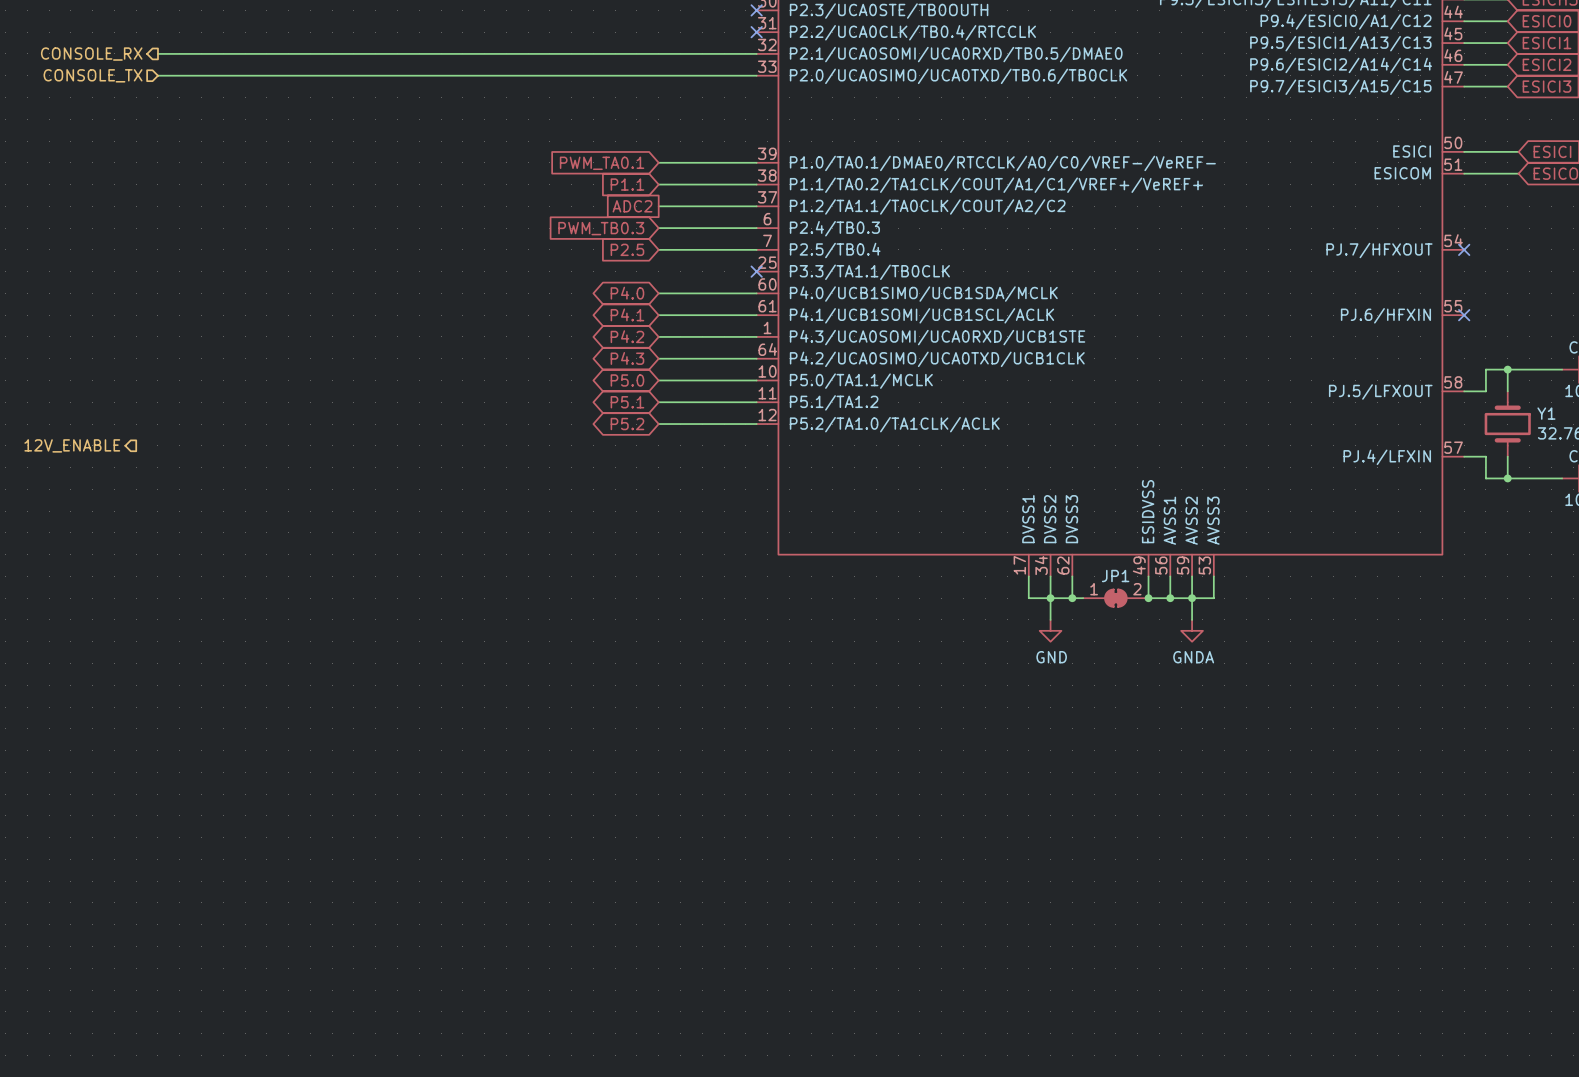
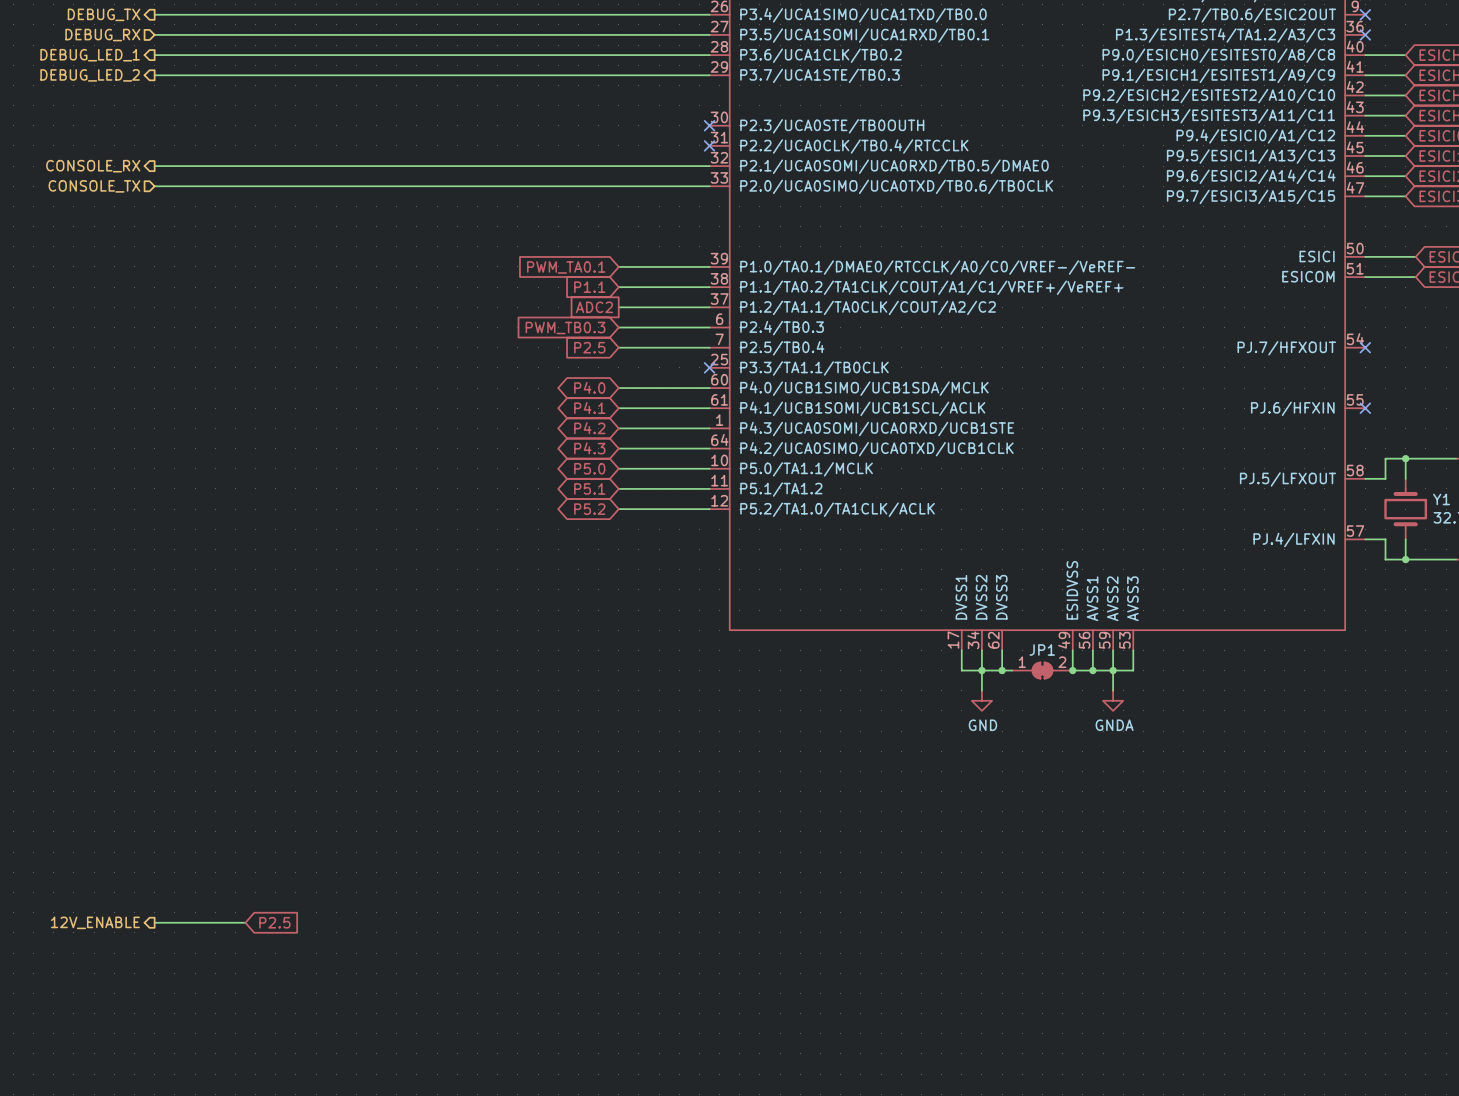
hierarchical label: 12V_ENABLE (72, 445) -> none
hierarchical label: none -> 12V_ENABLE (95, 922)
wire: none -> (154, 922) (245, 922)
global label: none -> P2.5 (274, 922)

